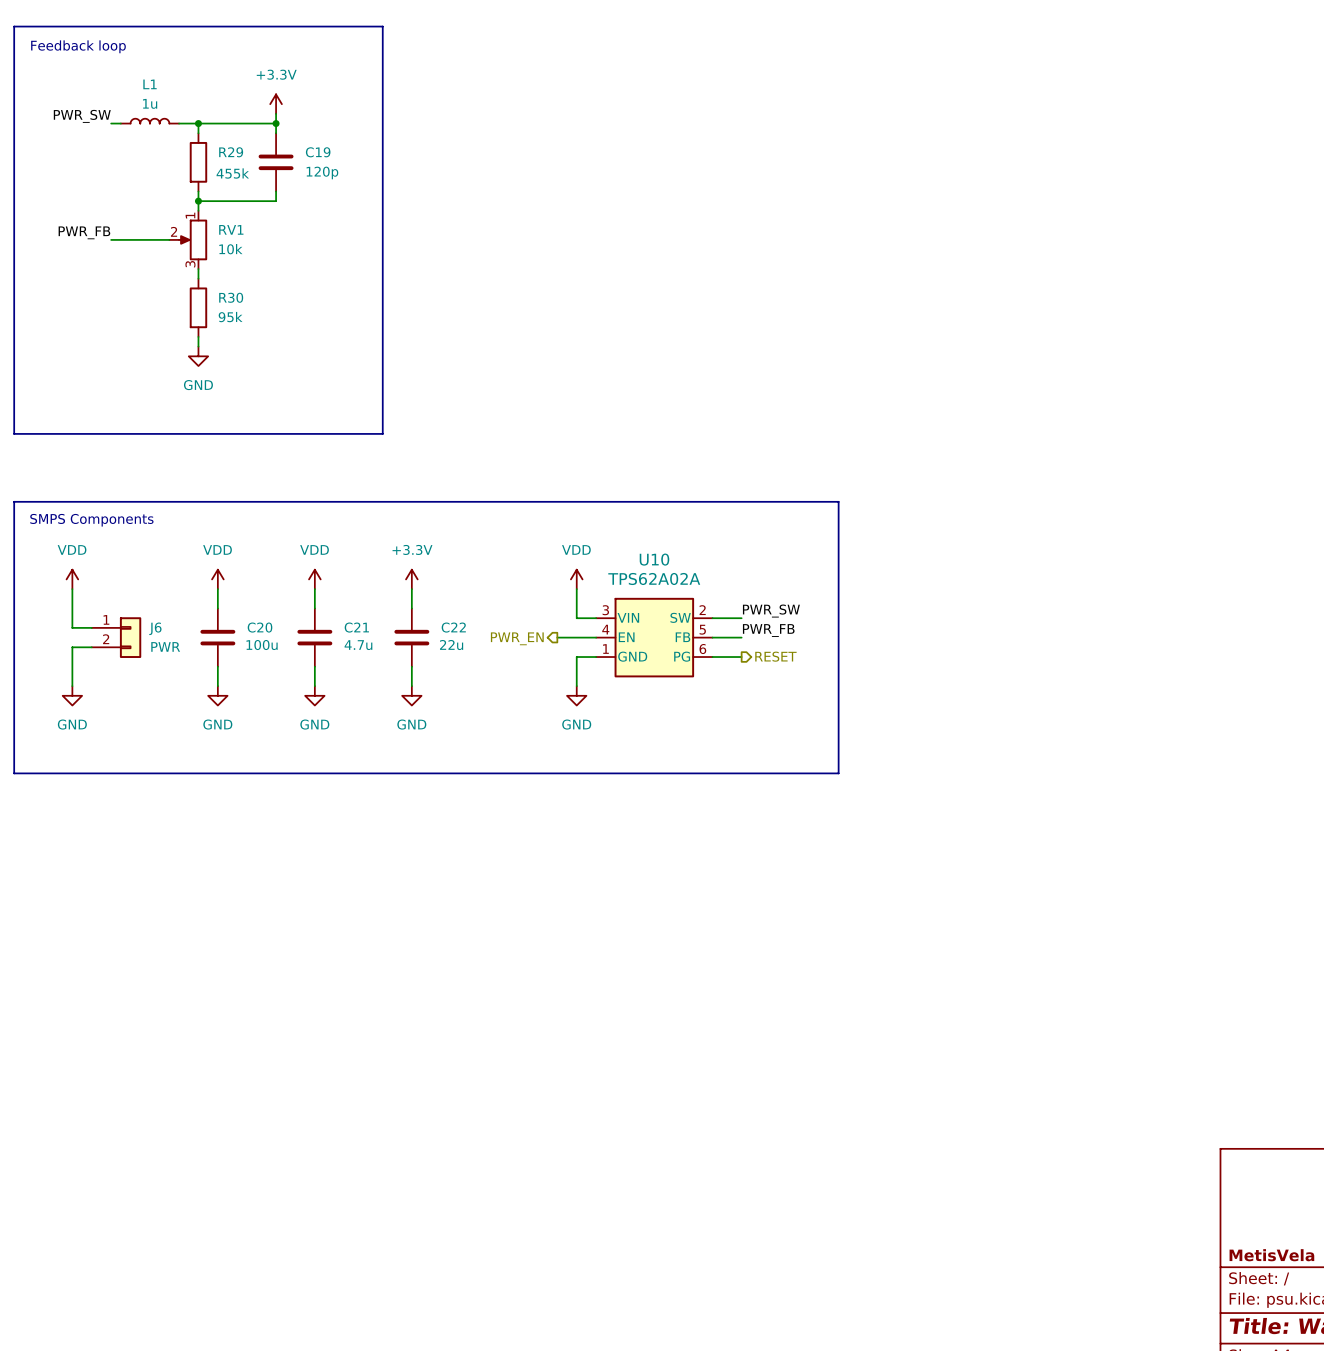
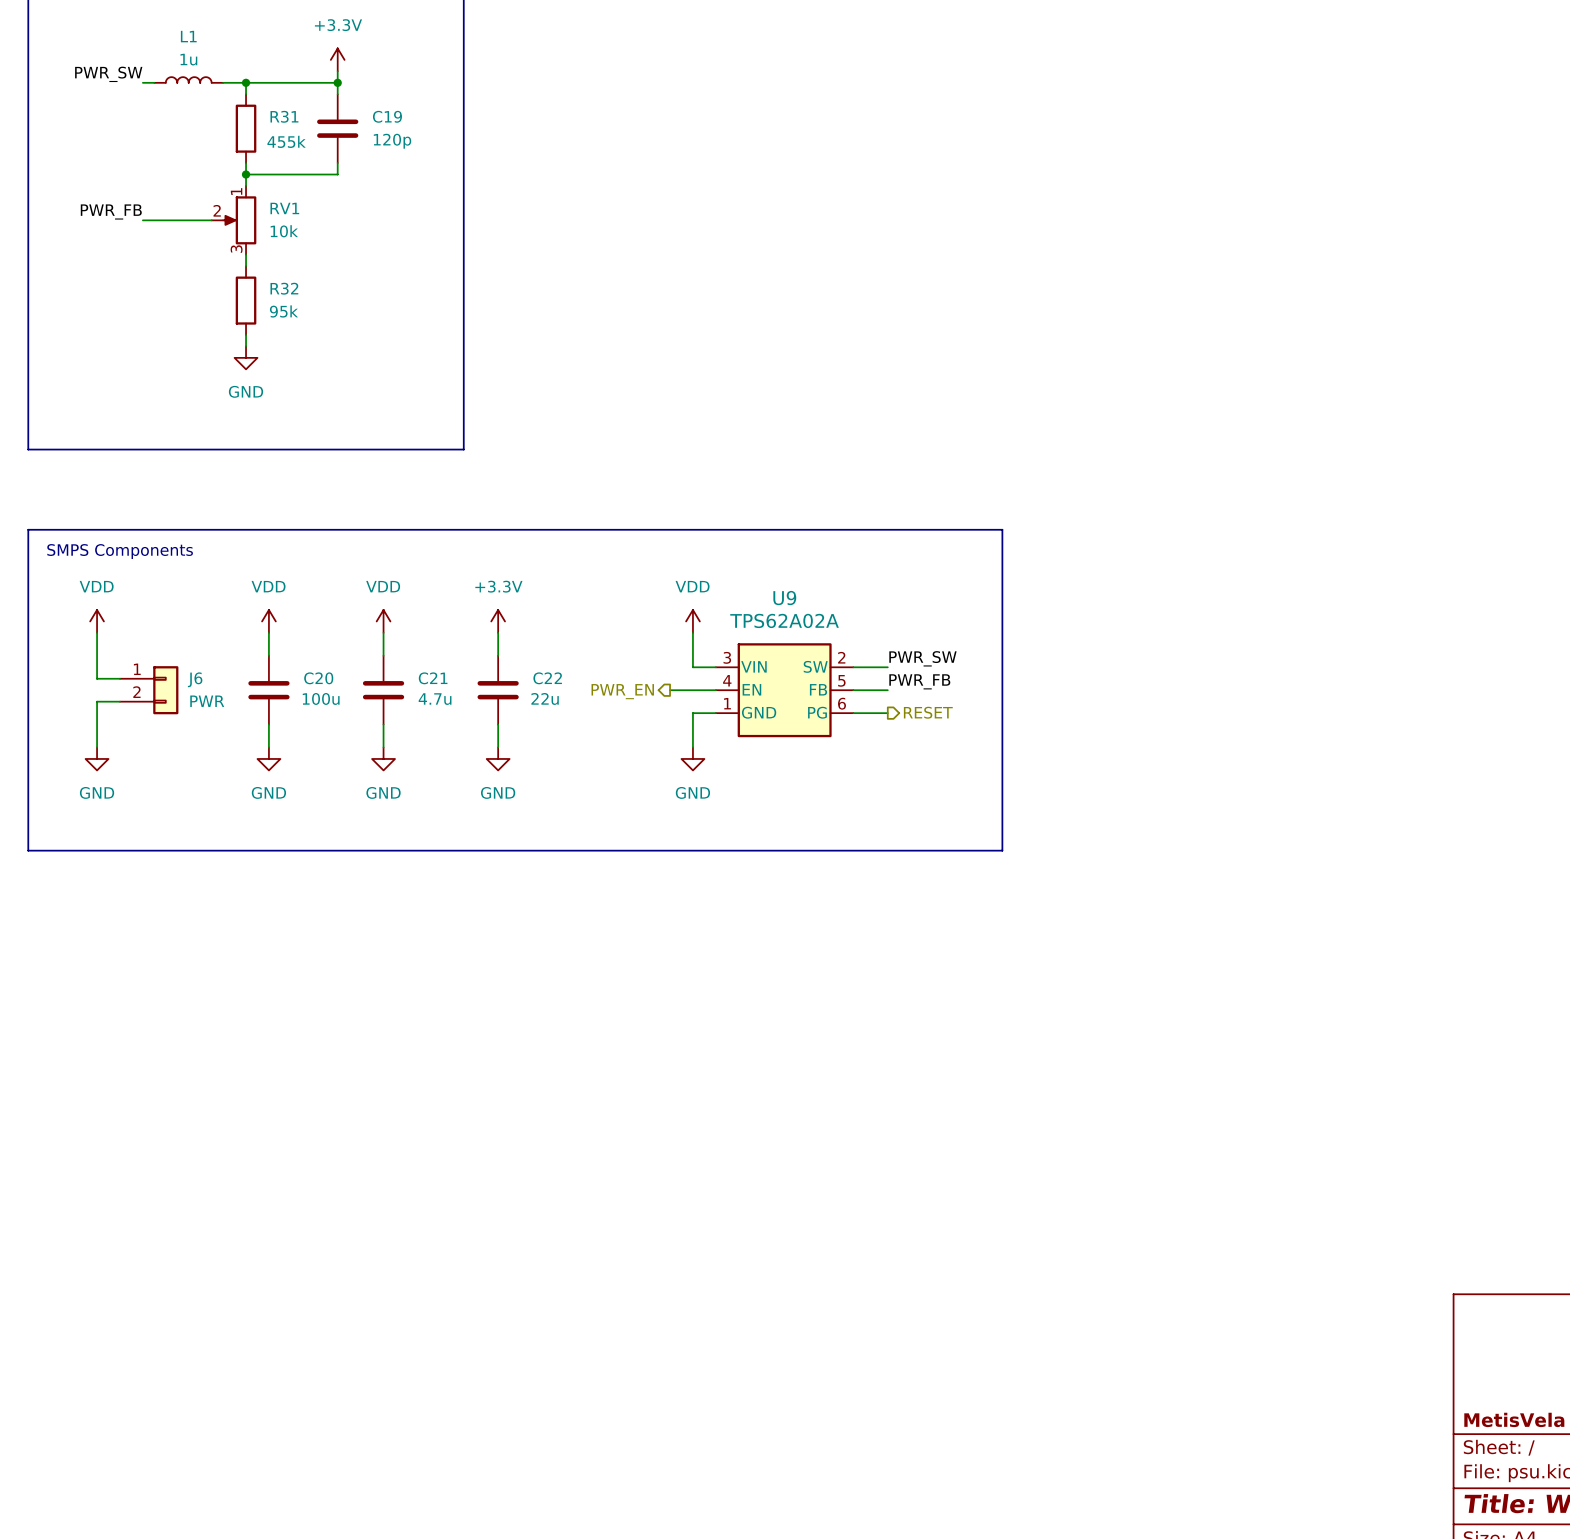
R29 name: R29 (231, 152) -> R31 (284, 116)
R30 name: R30 (231, 297) -> R32 (284, 288)
U10 name: U10 (654, 559) -> U9 (784, 598)

